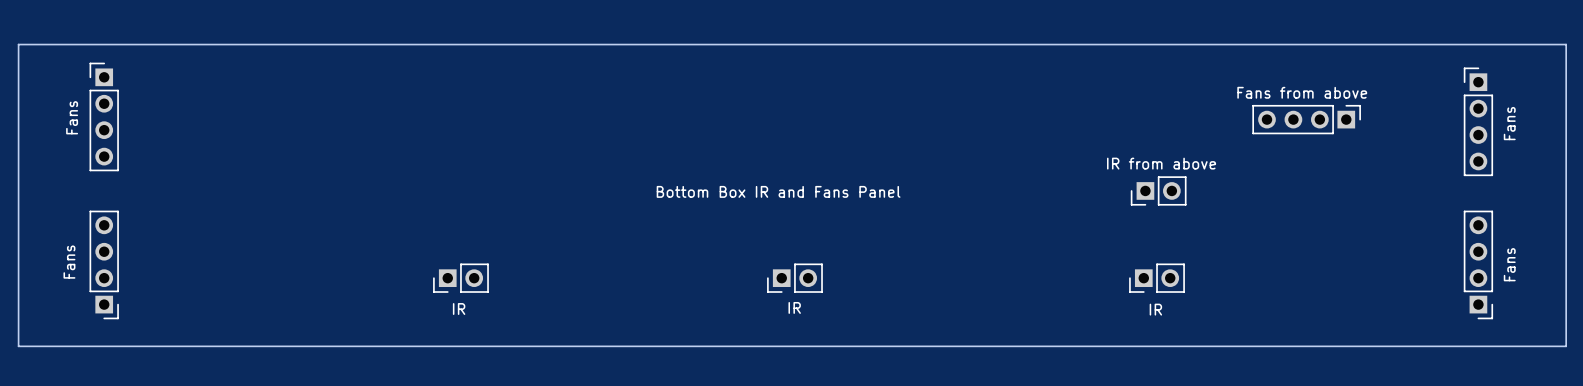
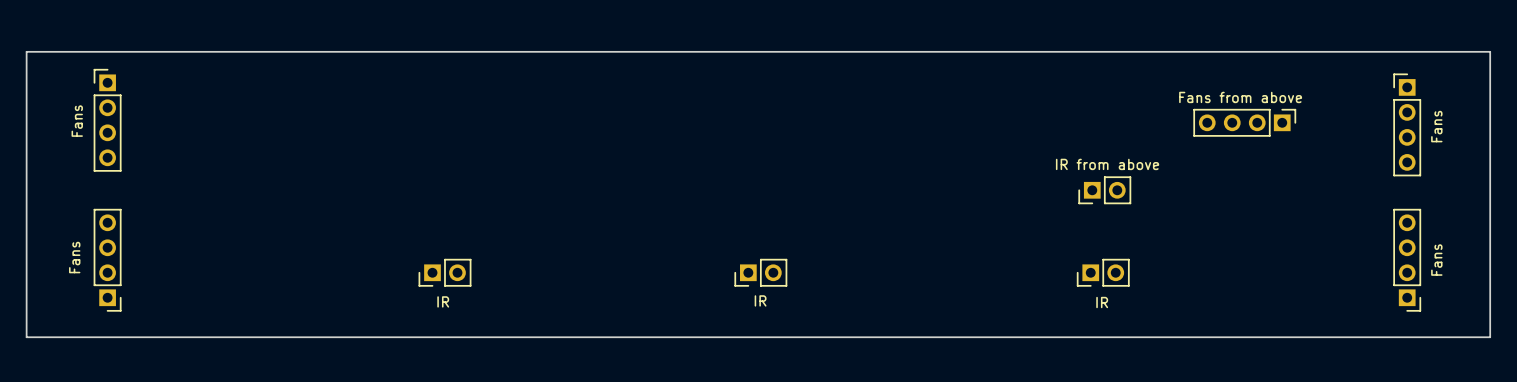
text: Bottom Box IR and Fans Panel (778, 191) -> none

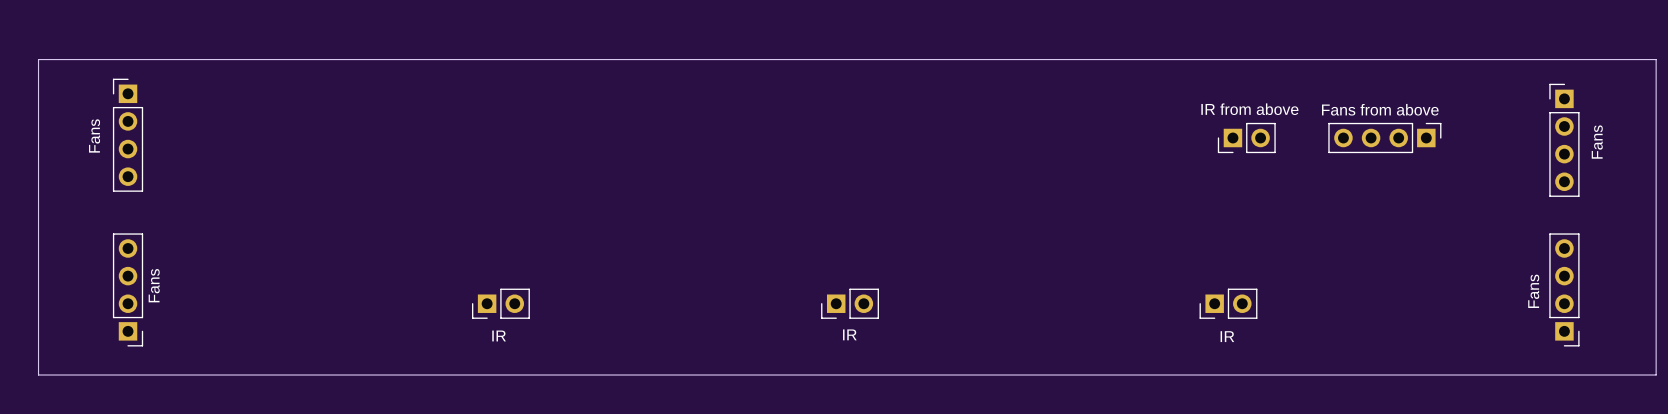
part position: (1104, 190) -> (1246, 138)
part value position: Fans (74, 257) -> Fans (154, 285)
part value position: Fans (1436, 260) -> Fans (1533, 291)

